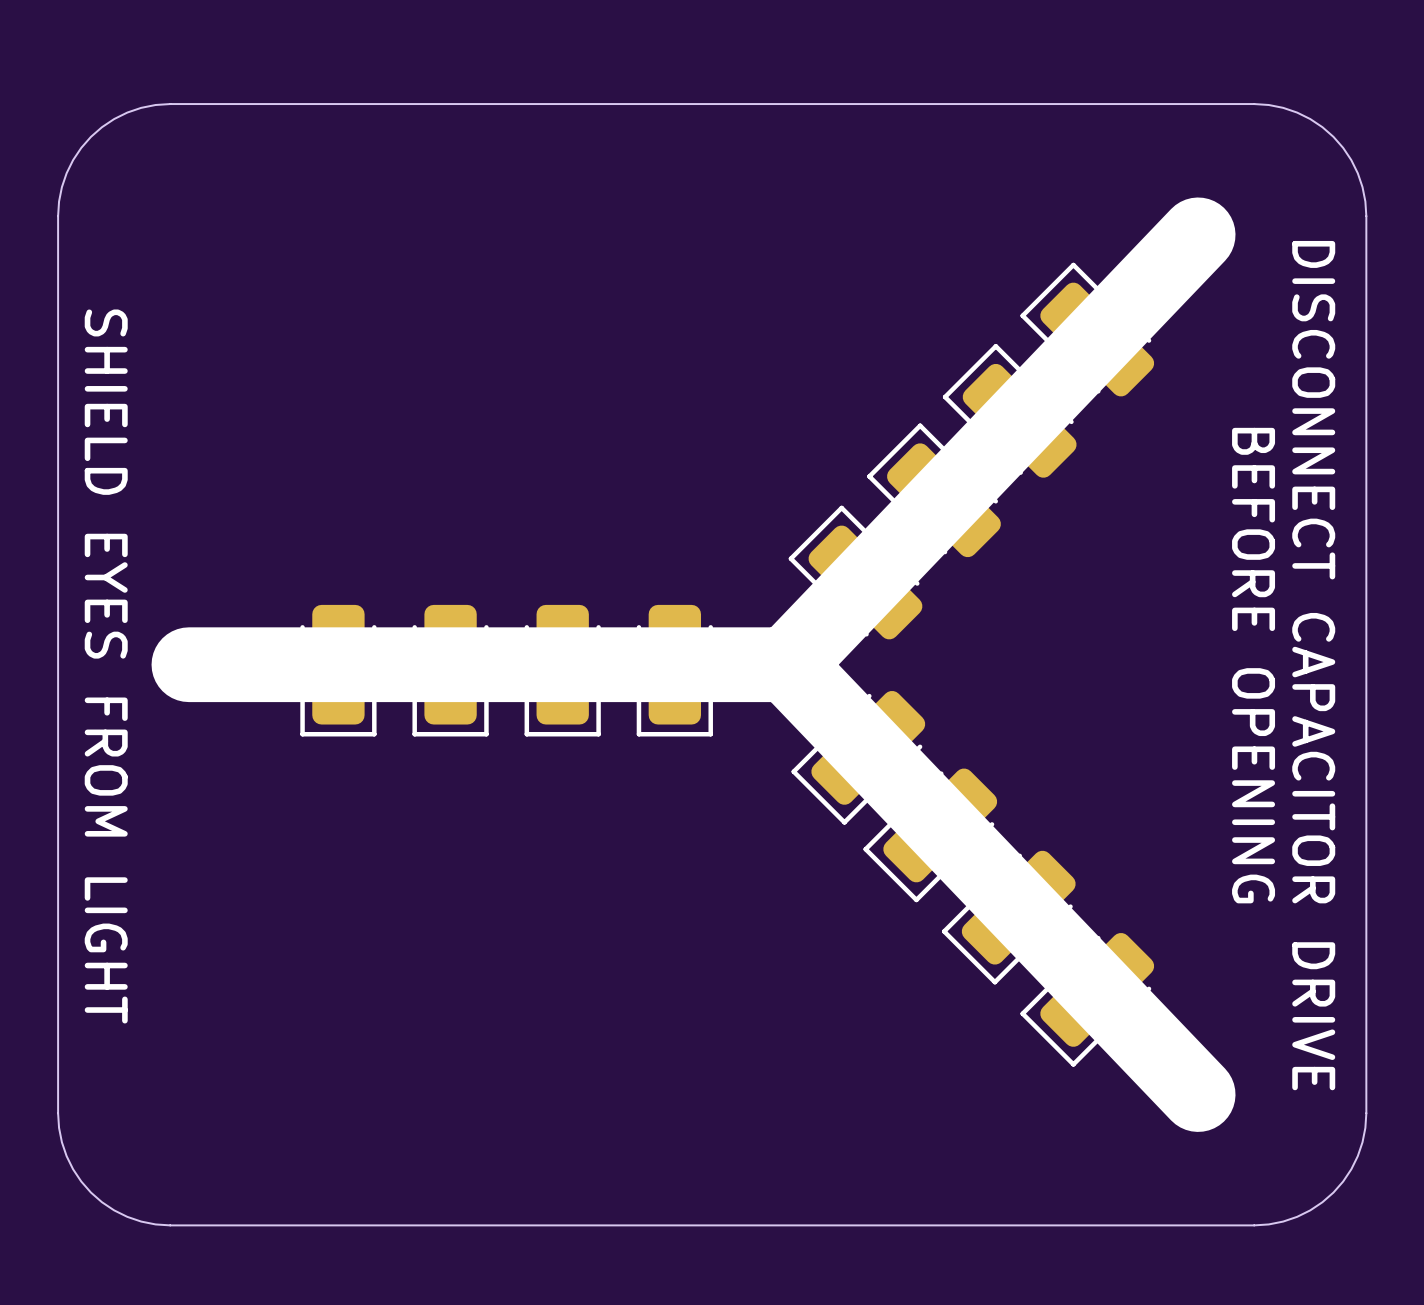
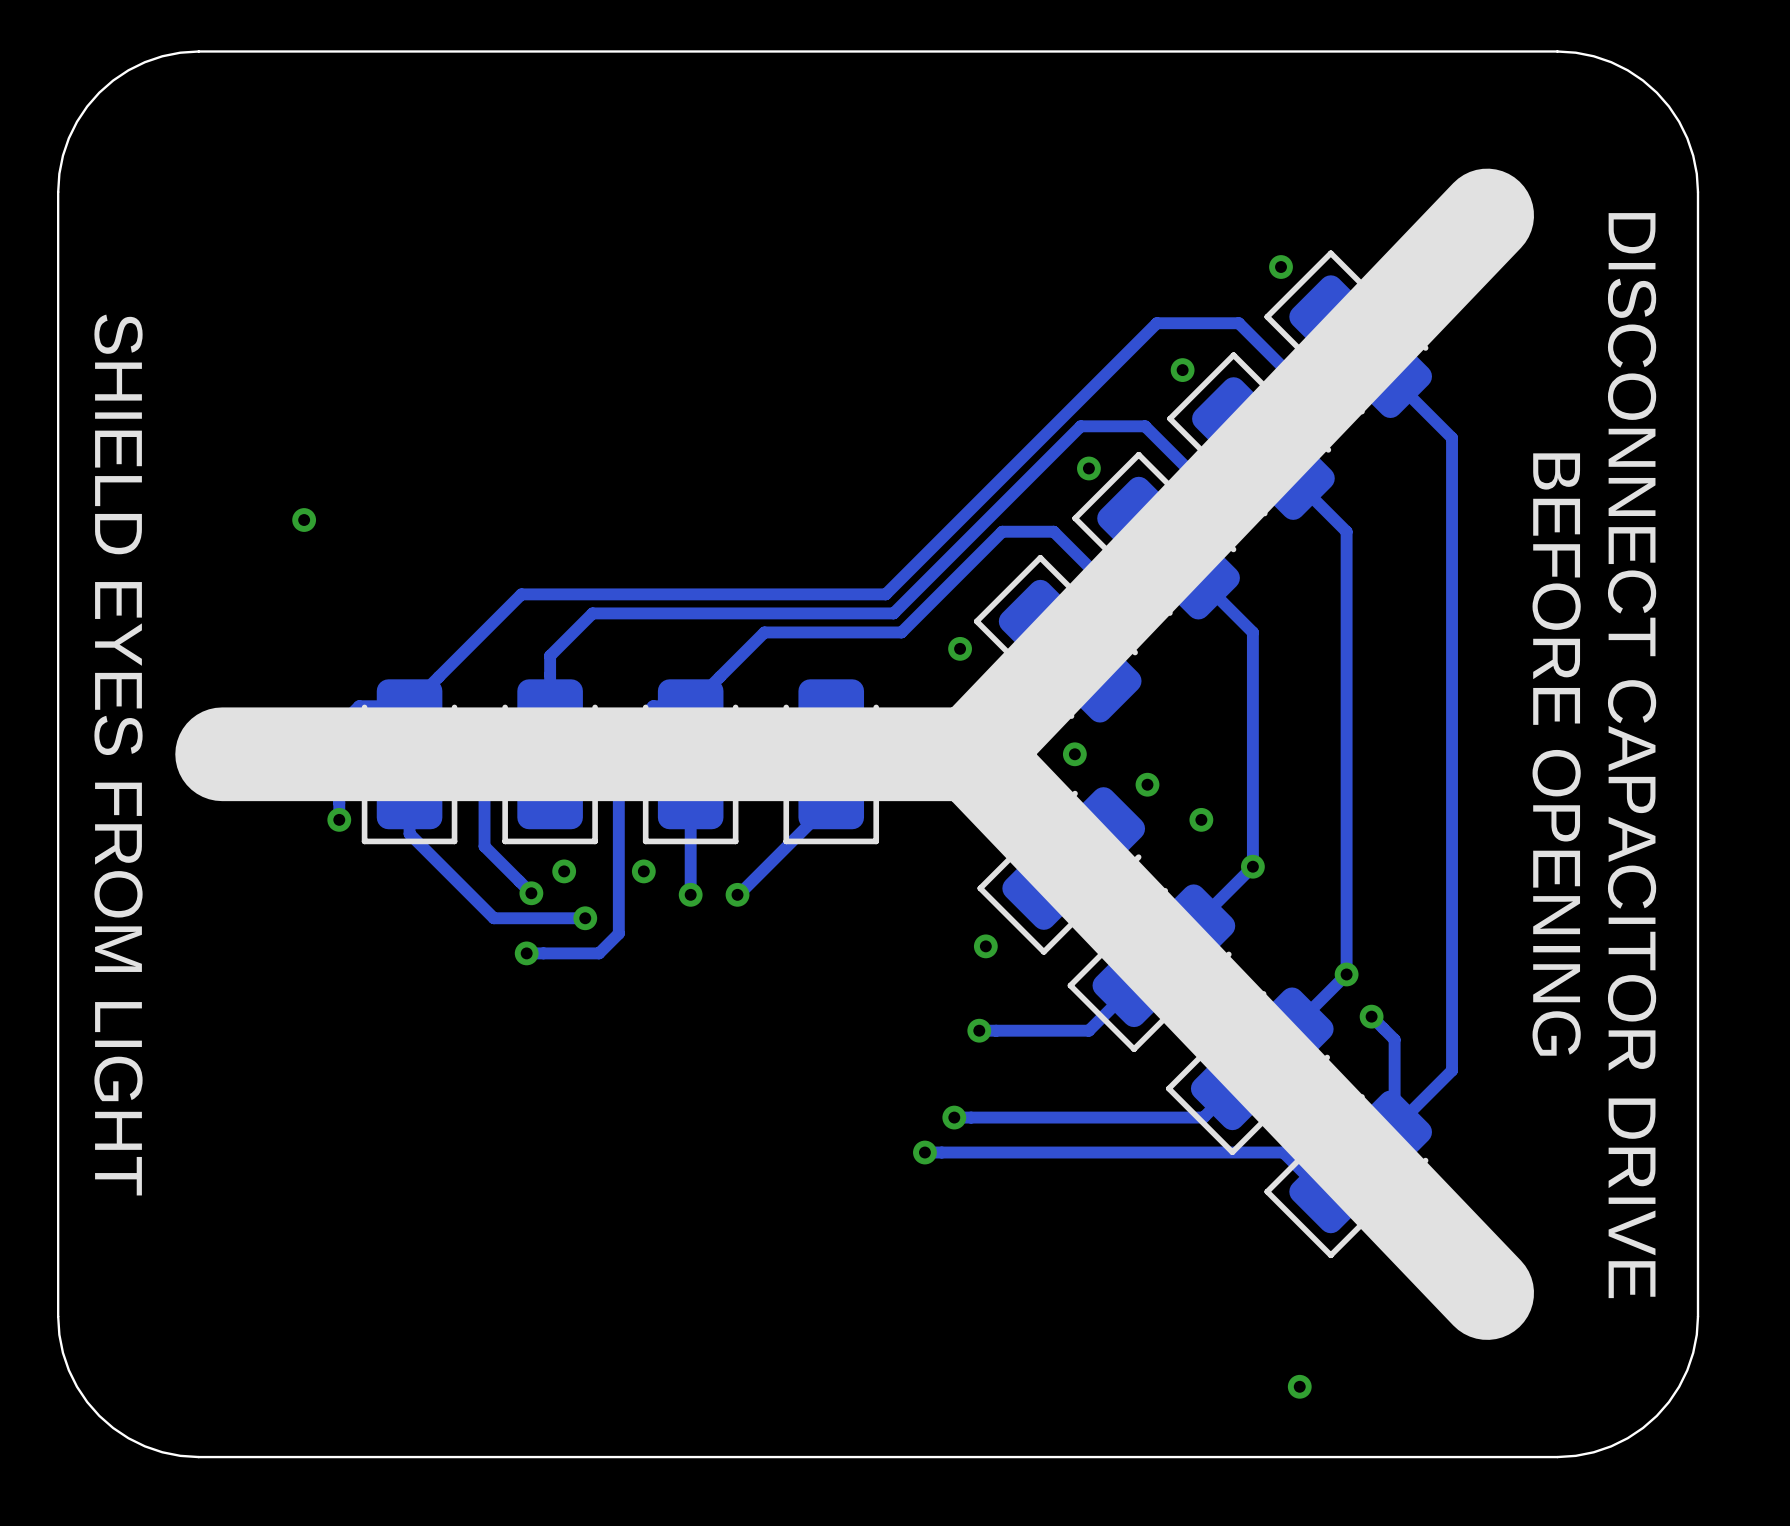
via: none -> (1281, 267)
via: none -> (1182, 370)
via: none -> (1088, 468)
via: none -> (304, 520)
via: none -> (960, 648)
via: none -> (1074, 754)
via: none -> (1147, 784)
track: none -> (409, 802) (409, 833) (493, 918) (585, 918)
track: none -> (690, 802) (690, 894)
track: none -> (831, 802) (737, 894)
track: none -> (339, 819) (339, 726) (359, 706) (409, 706) (521, 594) (885, 594) (1156, 323) (1238, 323) (1296, 380) (1394, 380) (1452, 438) (1452, 1070) (1394, 1127) (1394, 1039) (1371, 1016)
via: none -> (339, 819)
via: none -> (1201, 819)
via: none -> (1252, 866)
via: none -> (564, 871)
via: none -> (643, 871)
track: none -> (531, 893) (484, 846) (484, 771) (550, 706) (550, 655) (592, 613) (893, 613) (1080, 426) (1145, 426) (1201, 482) (1297, 482) (1346, 531) (1346, 974) (1296, 1024)
via: none -> (531, 893)
via: none -> (690, 894)
via: none -> (737, 894)
via: none -> (585, 918)
track: none -> (1197, 921) (1252, 866) (1252, 632) (1202, 582) (1104, 582) (1053, 531) (1002, 531) (901, 632) (764, 632) (690, 706) (653, 706) (618, 740) (618, 933) (599, 953) (526, 953)
via: none -> (985, 946)
via: none -> (526, 953)
via: none -> (1346, 974)
track: none -> (1129, 989) (1088, 1030) (979, 1030)
via: none -> (1371, 1016)
via: none -> (979, 1030)
track: none -> (1228, 1092) (1203, 1117) (954, 1117)
via: none -> (954, 1117)
track: none -> (924, 1152) (1283, 1152) (1326, 1195)
via: none -> (924, 1152)
via: none -> (1299, 1386)

